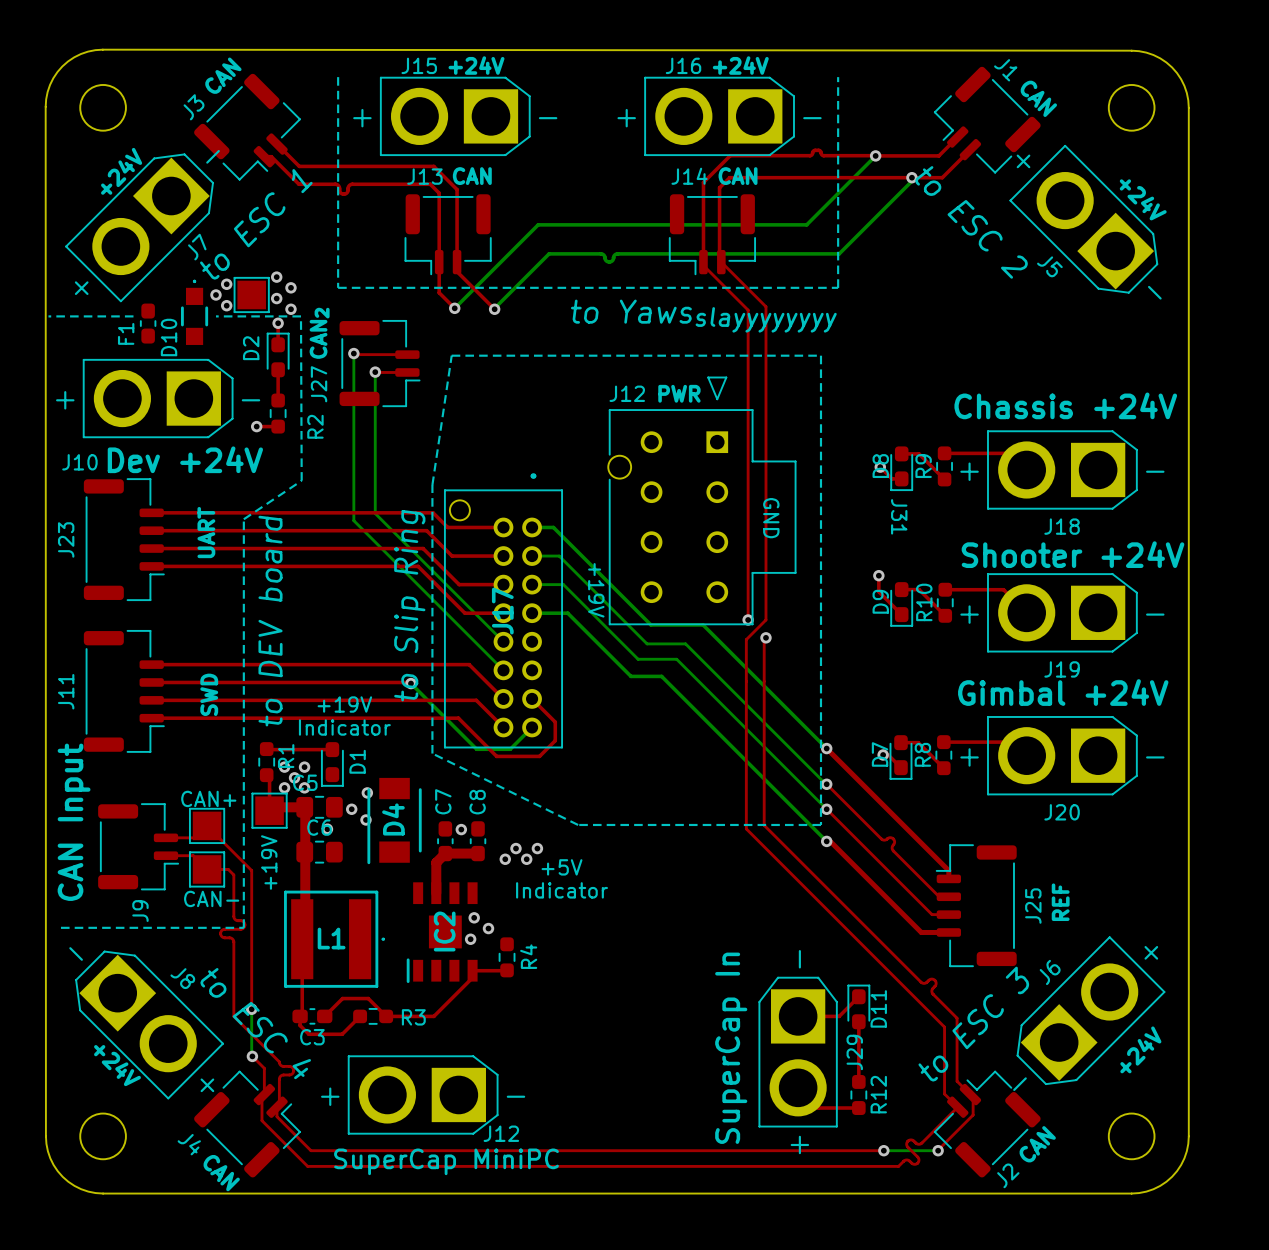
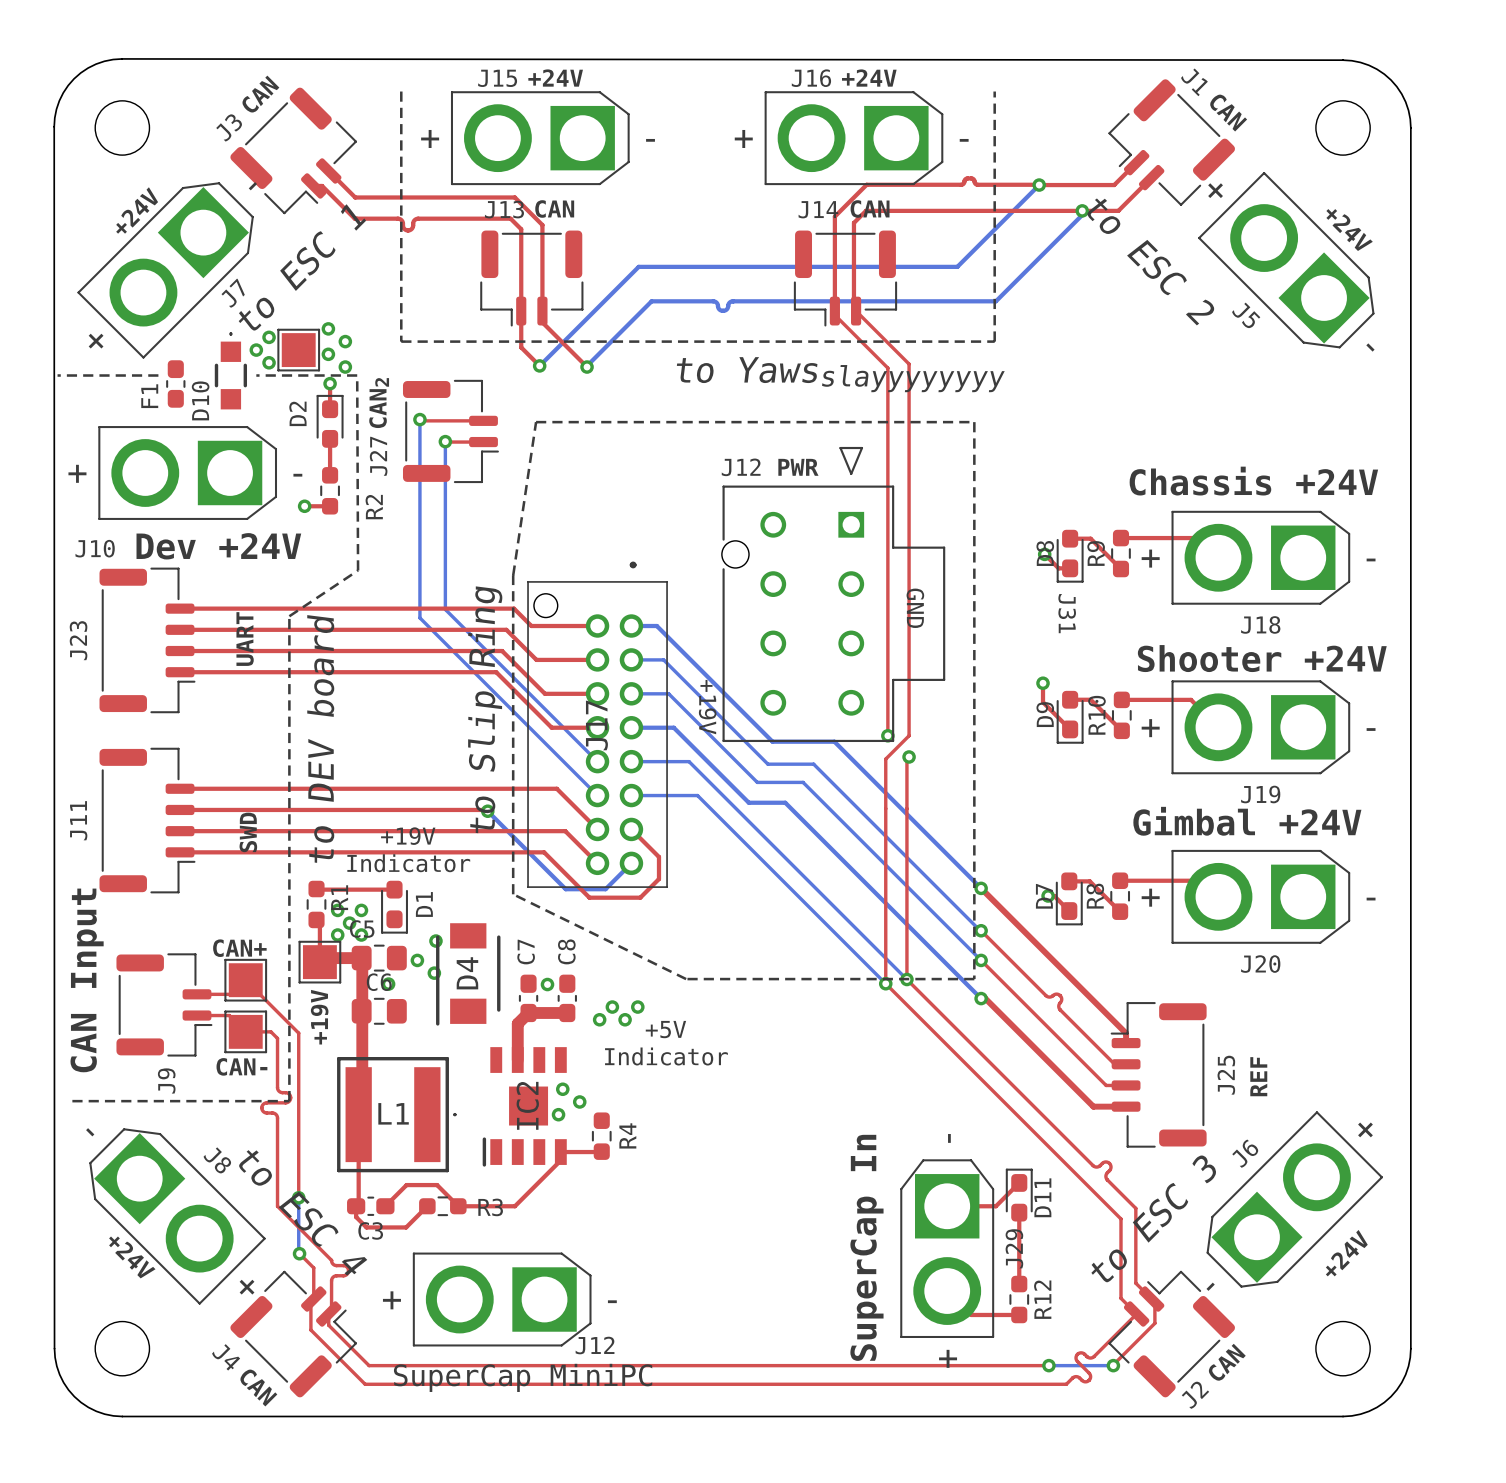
bottom track: none -> (631, 761) (689, 761) (906, 979)
bottom track: none -> (631, 795) (697, 795) (885, 983)
via: none -> (906, 979)
via: none -> (885, 983)

